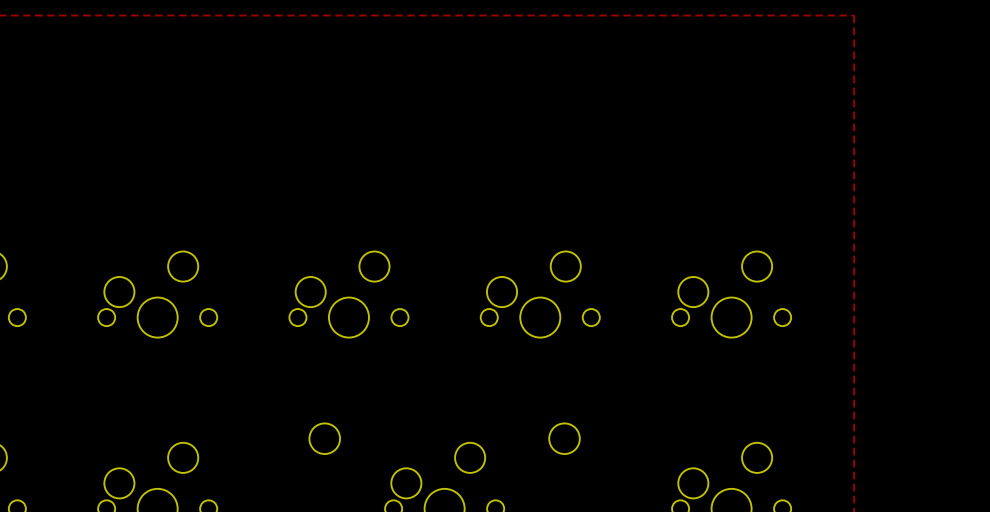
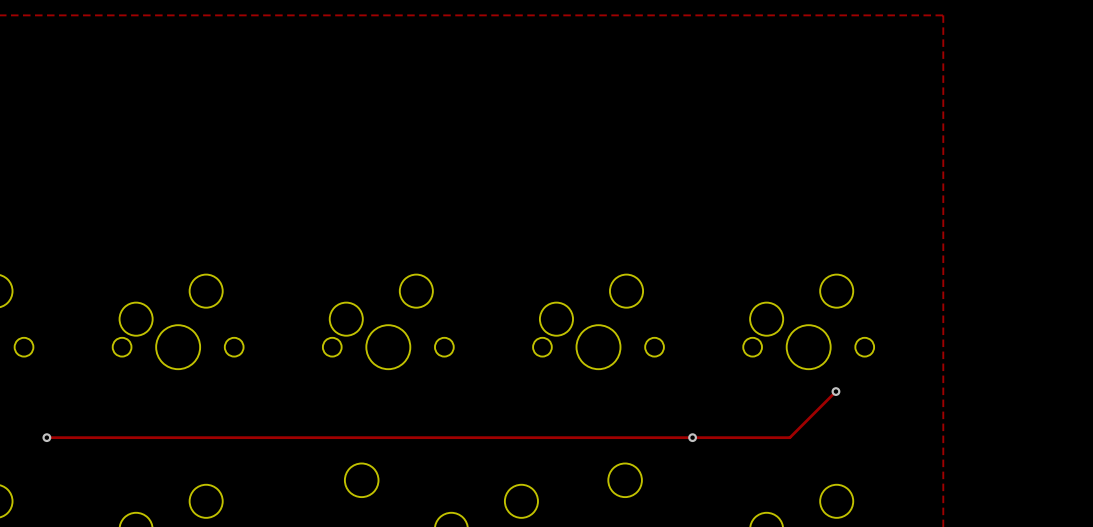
track: none -> (835, 391) (789, 437) (46, 437)
via: none -> (835, 391)
via: none -> (46, 437)
via: none -> (692, 437)

